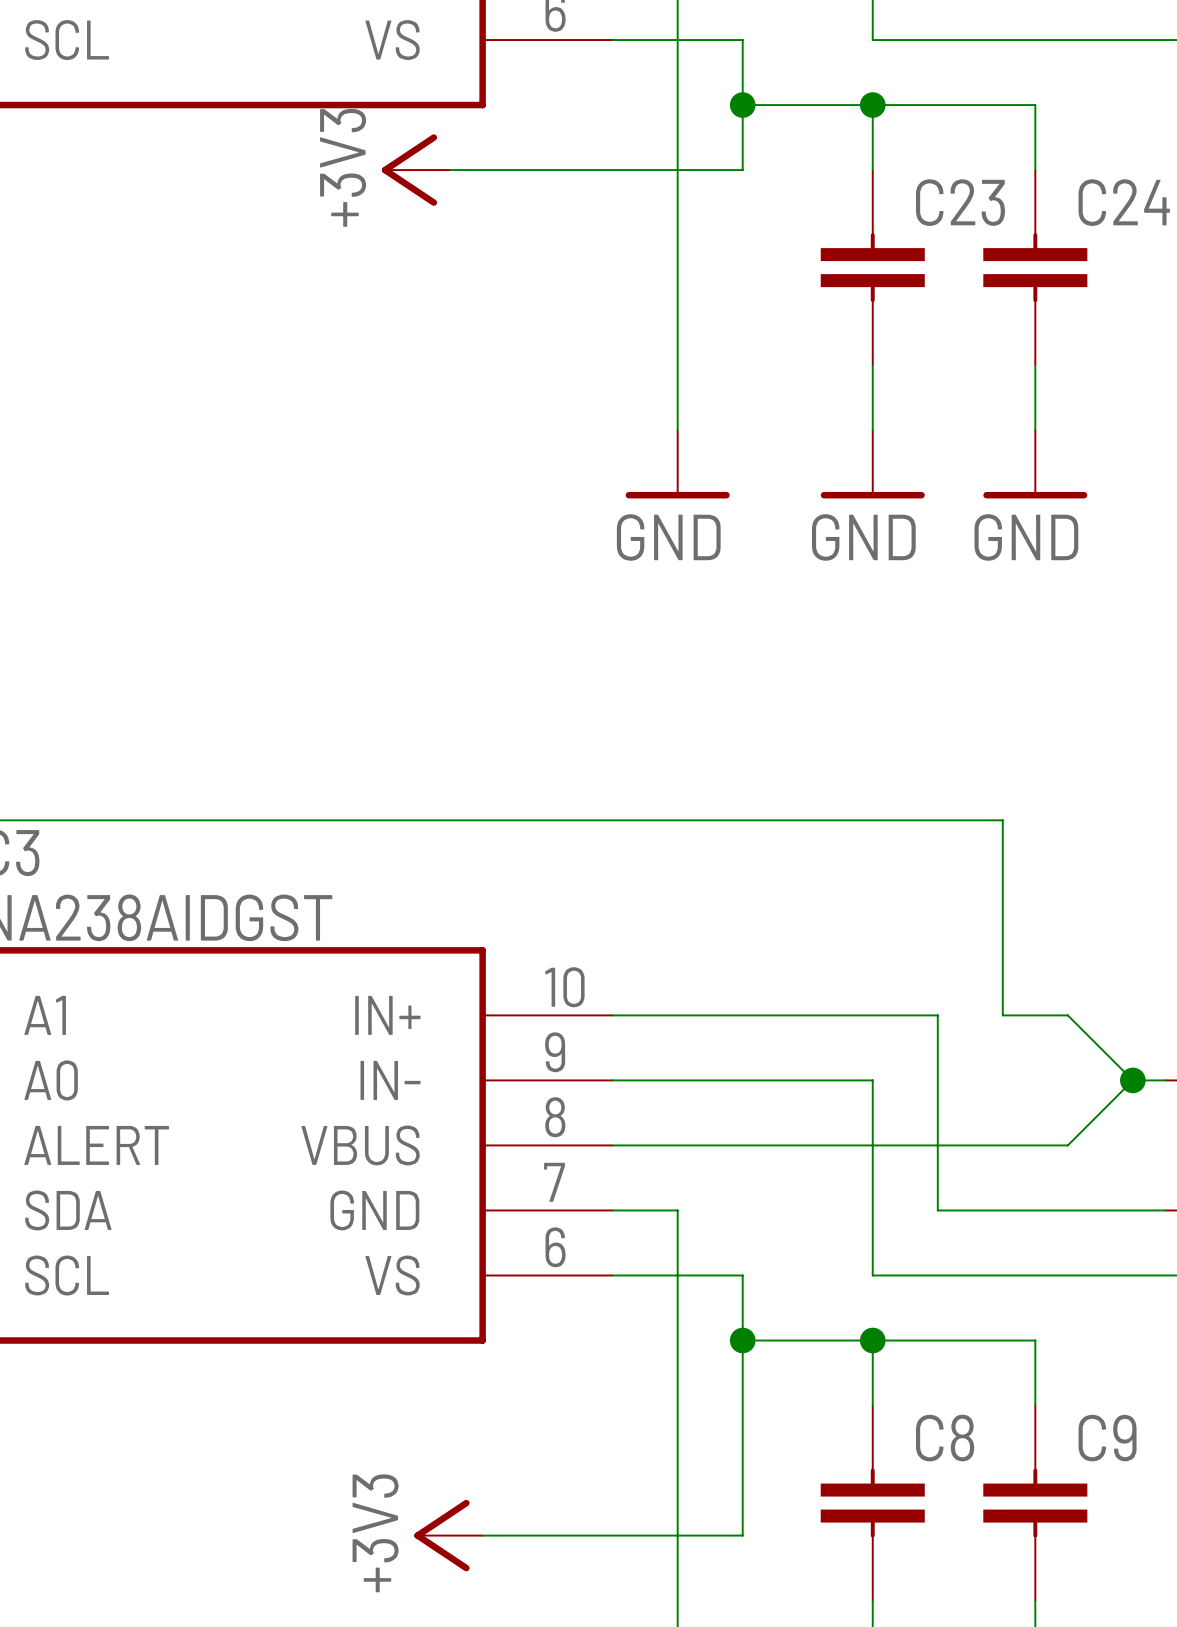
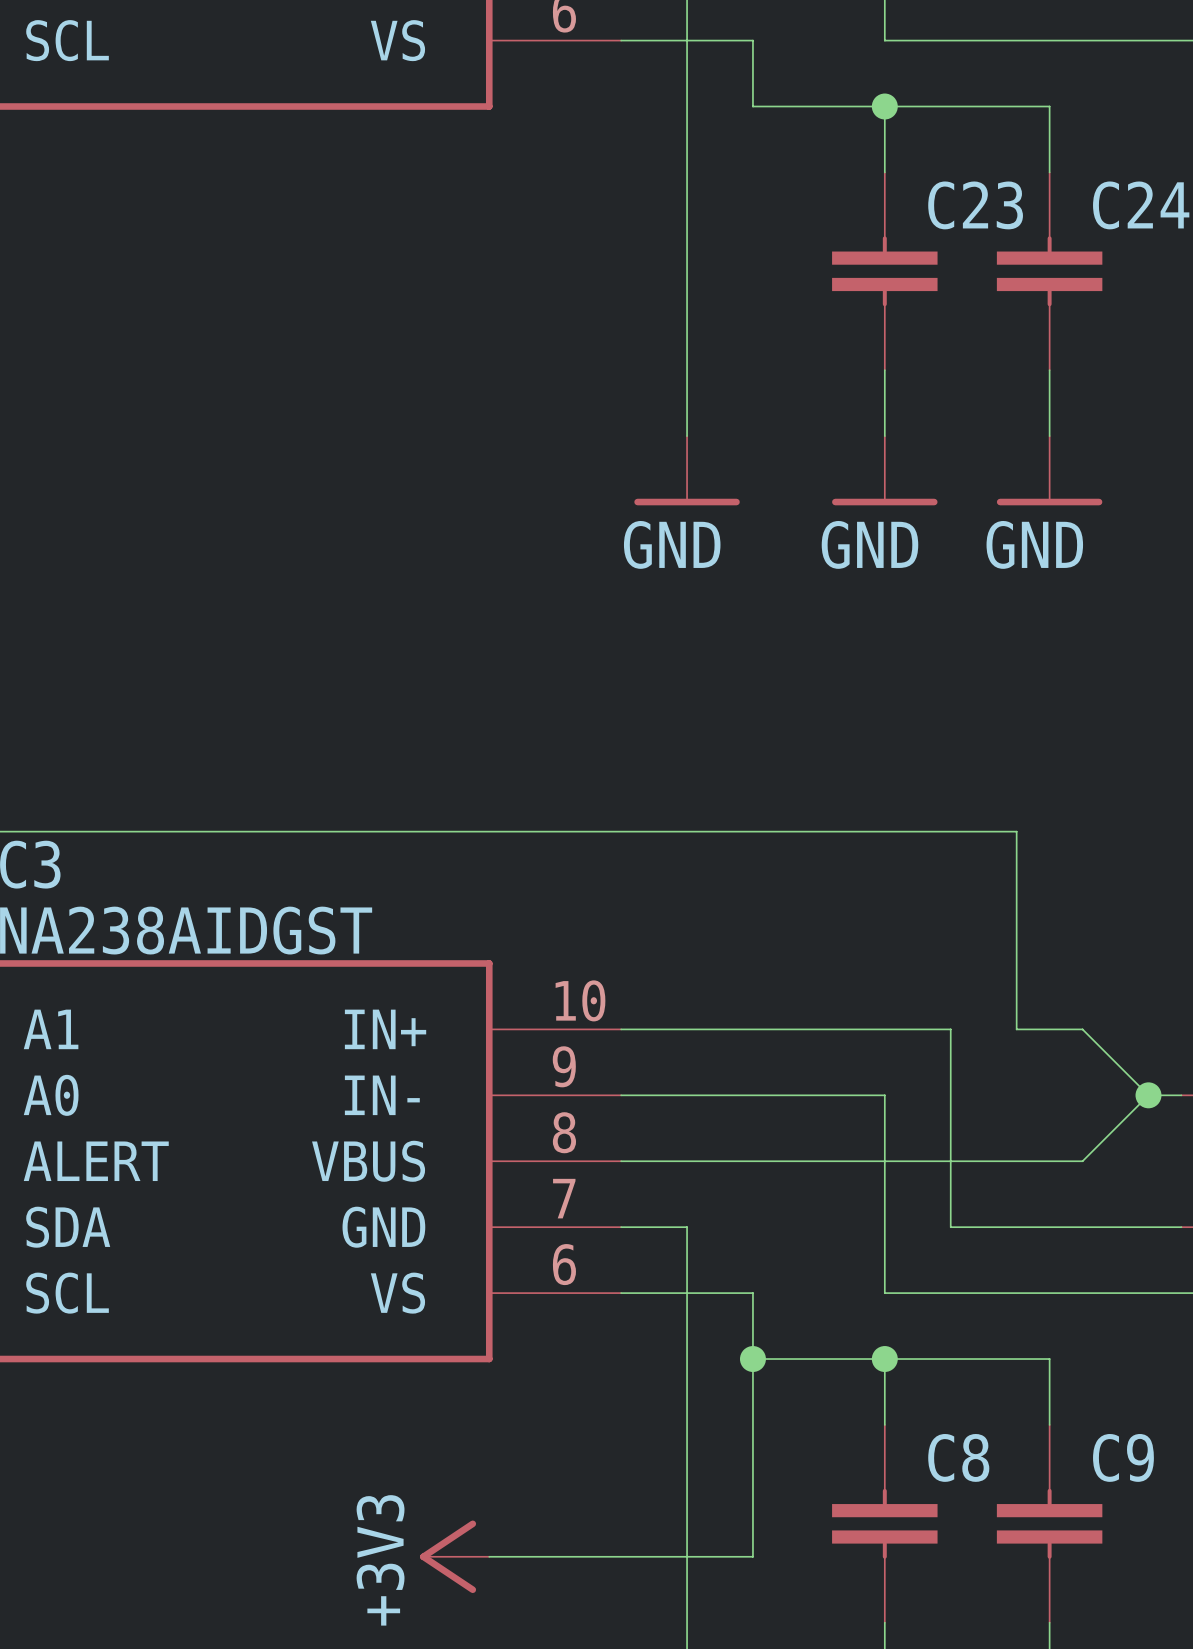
wire: (742, 105) (742, 170) (450, 170) -> none
junction: (742, 105) -> none
power symbol: +3V3 (415, 170) -> none

